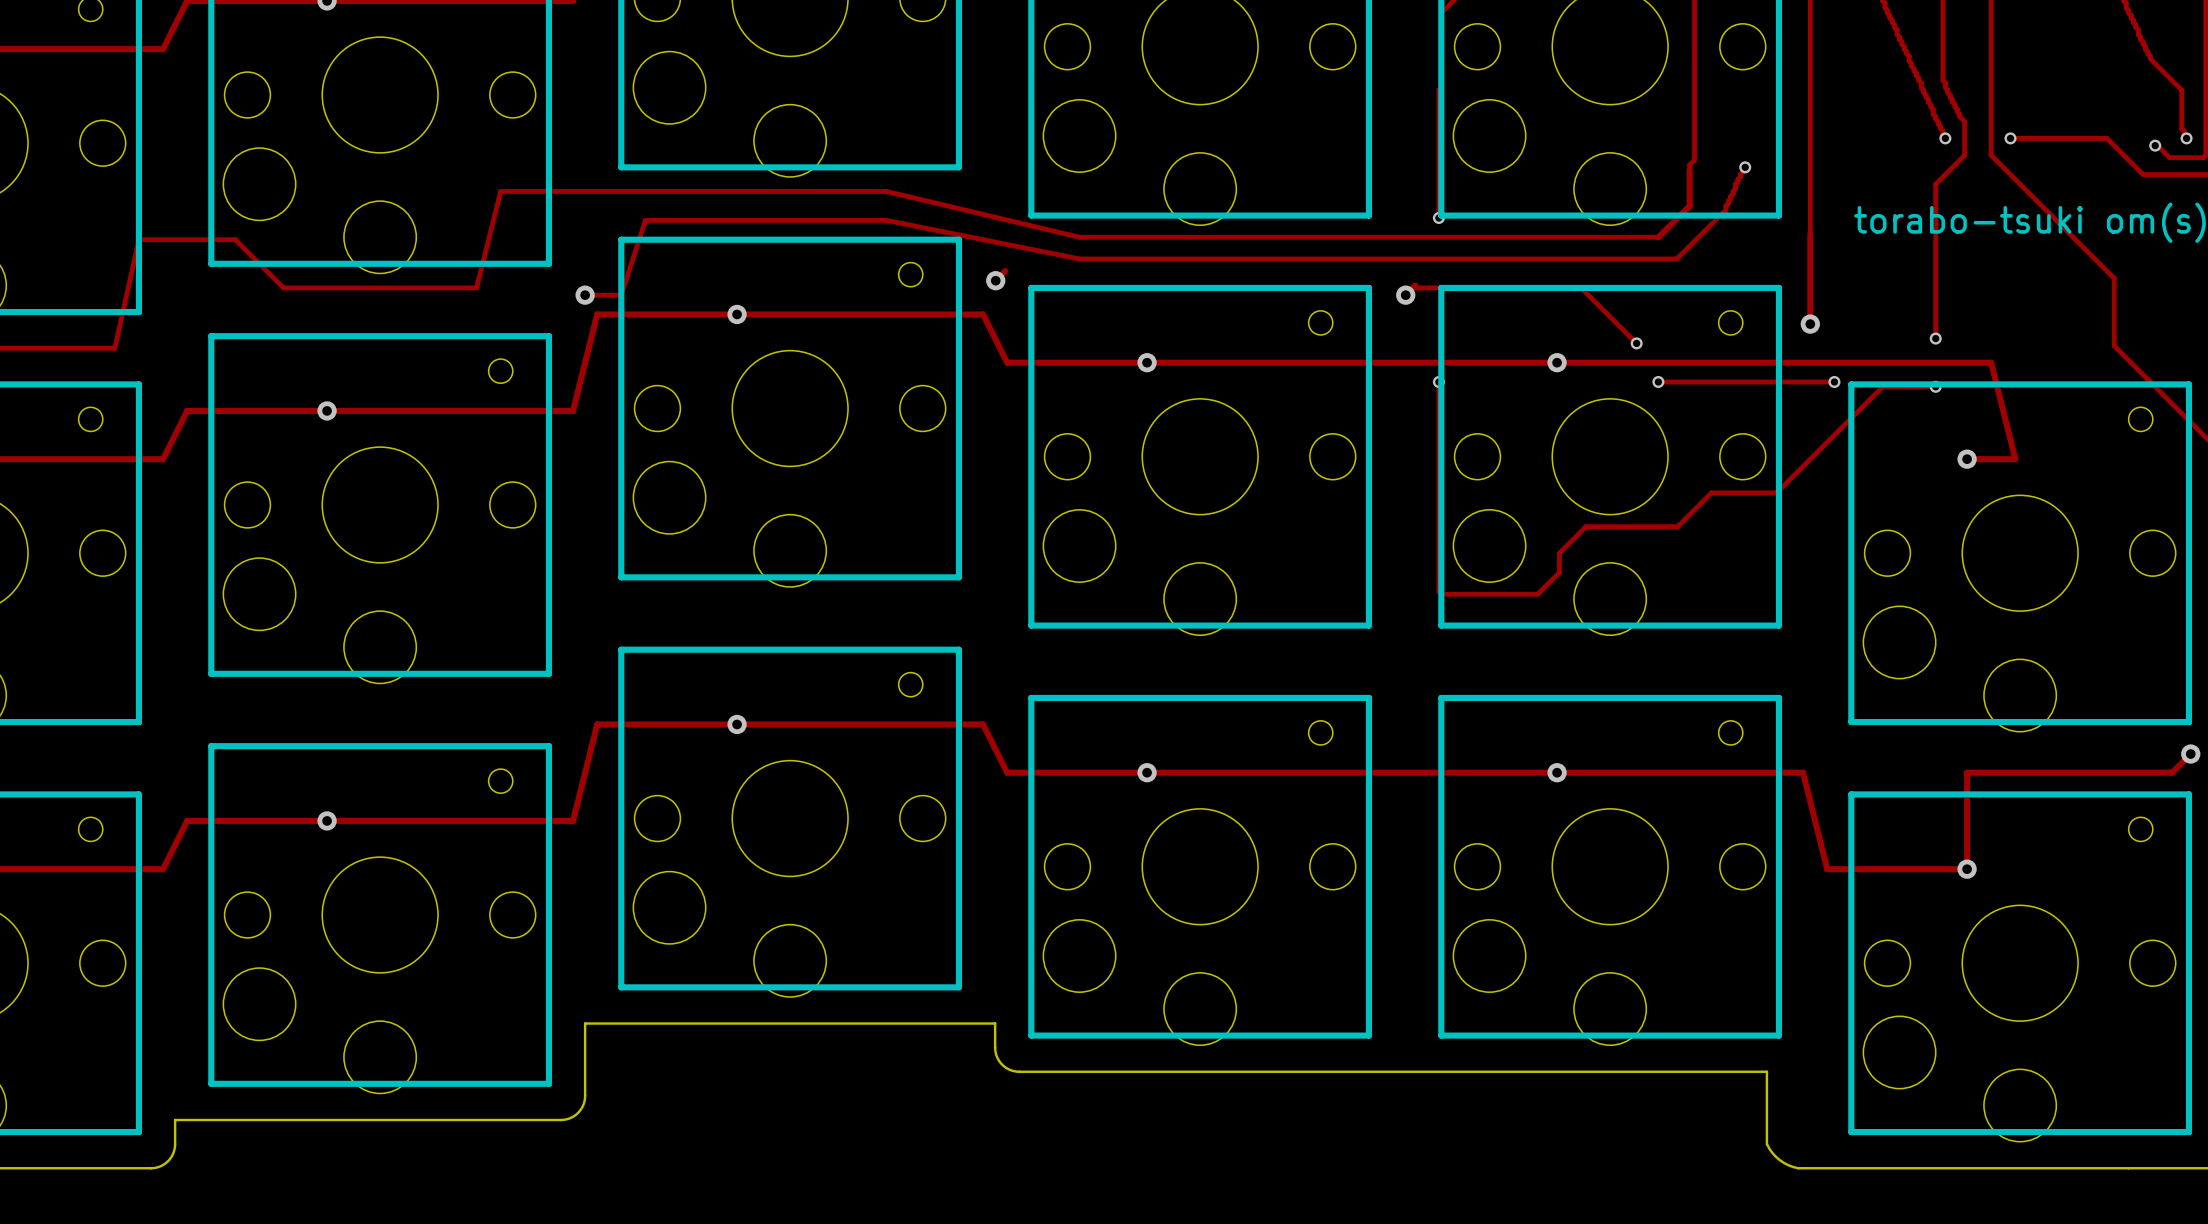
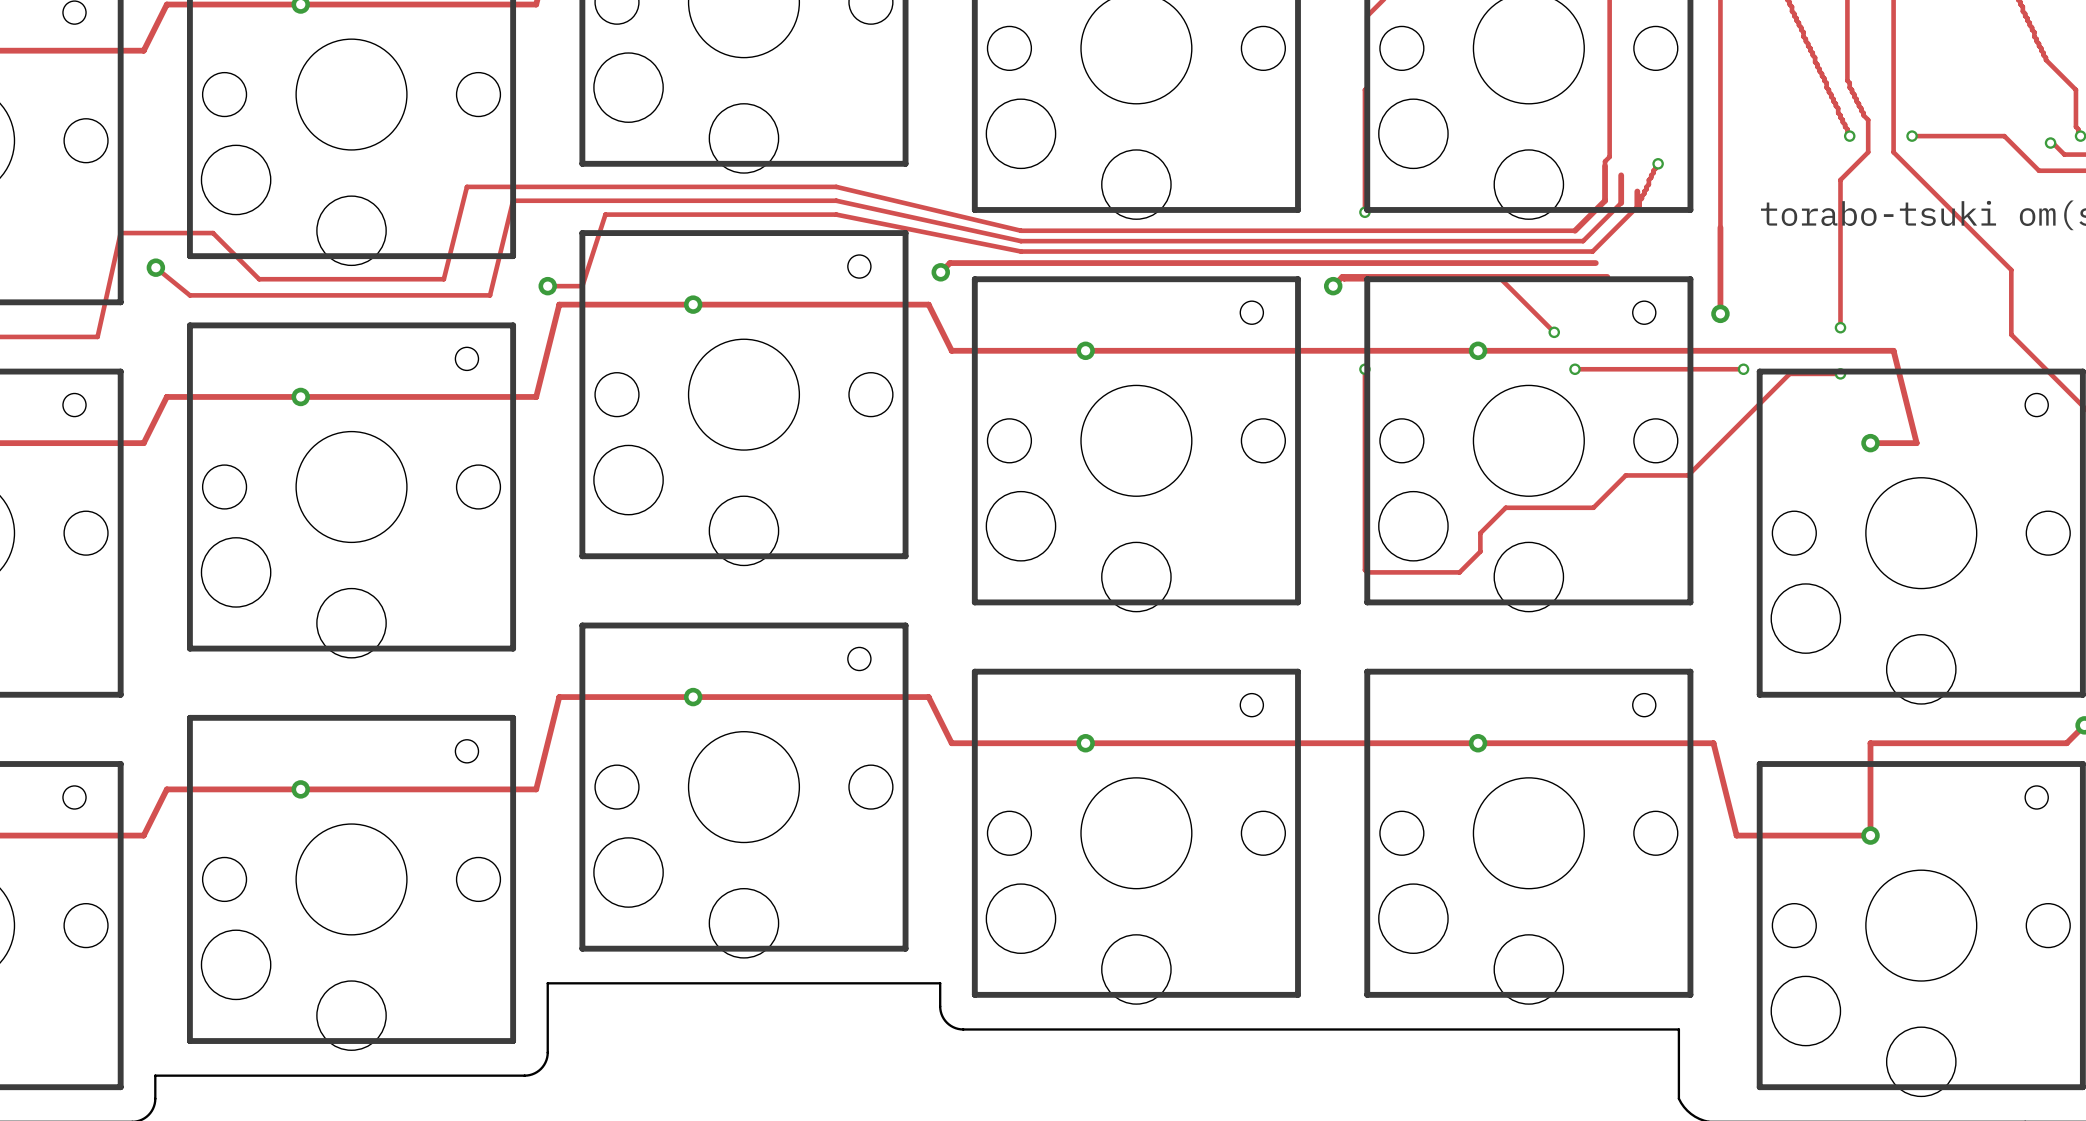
track: none -> (1621, 175) (1621, 203) (1583, 241) (1020, 241) (836, 200) (513, 200) (490, 295) (189, 295) (155, 267)
track: none -> (1637, 191) (1637, 206)
track: none -> (949, 263) (1595, 263)
via: none -> (155, 267)
track: none -> (1342, 276) (1607, 276)

